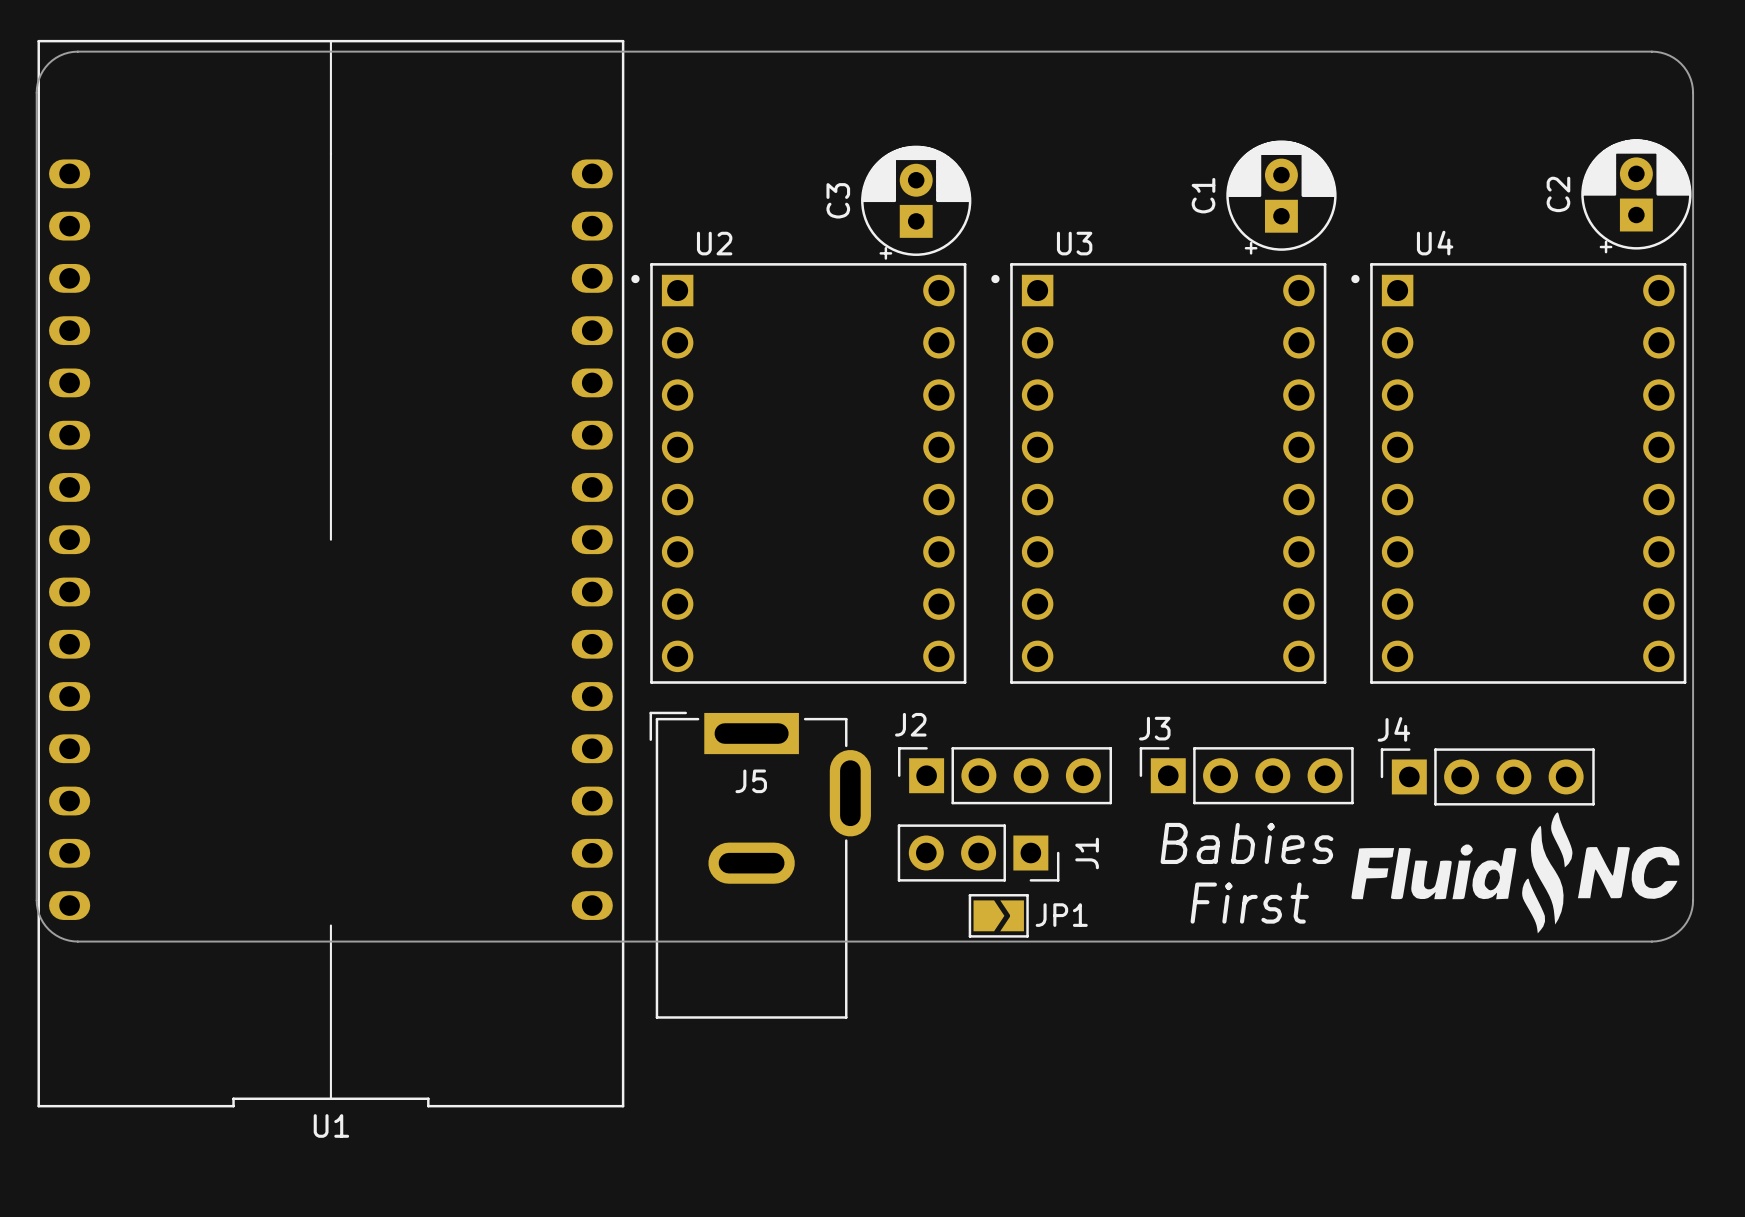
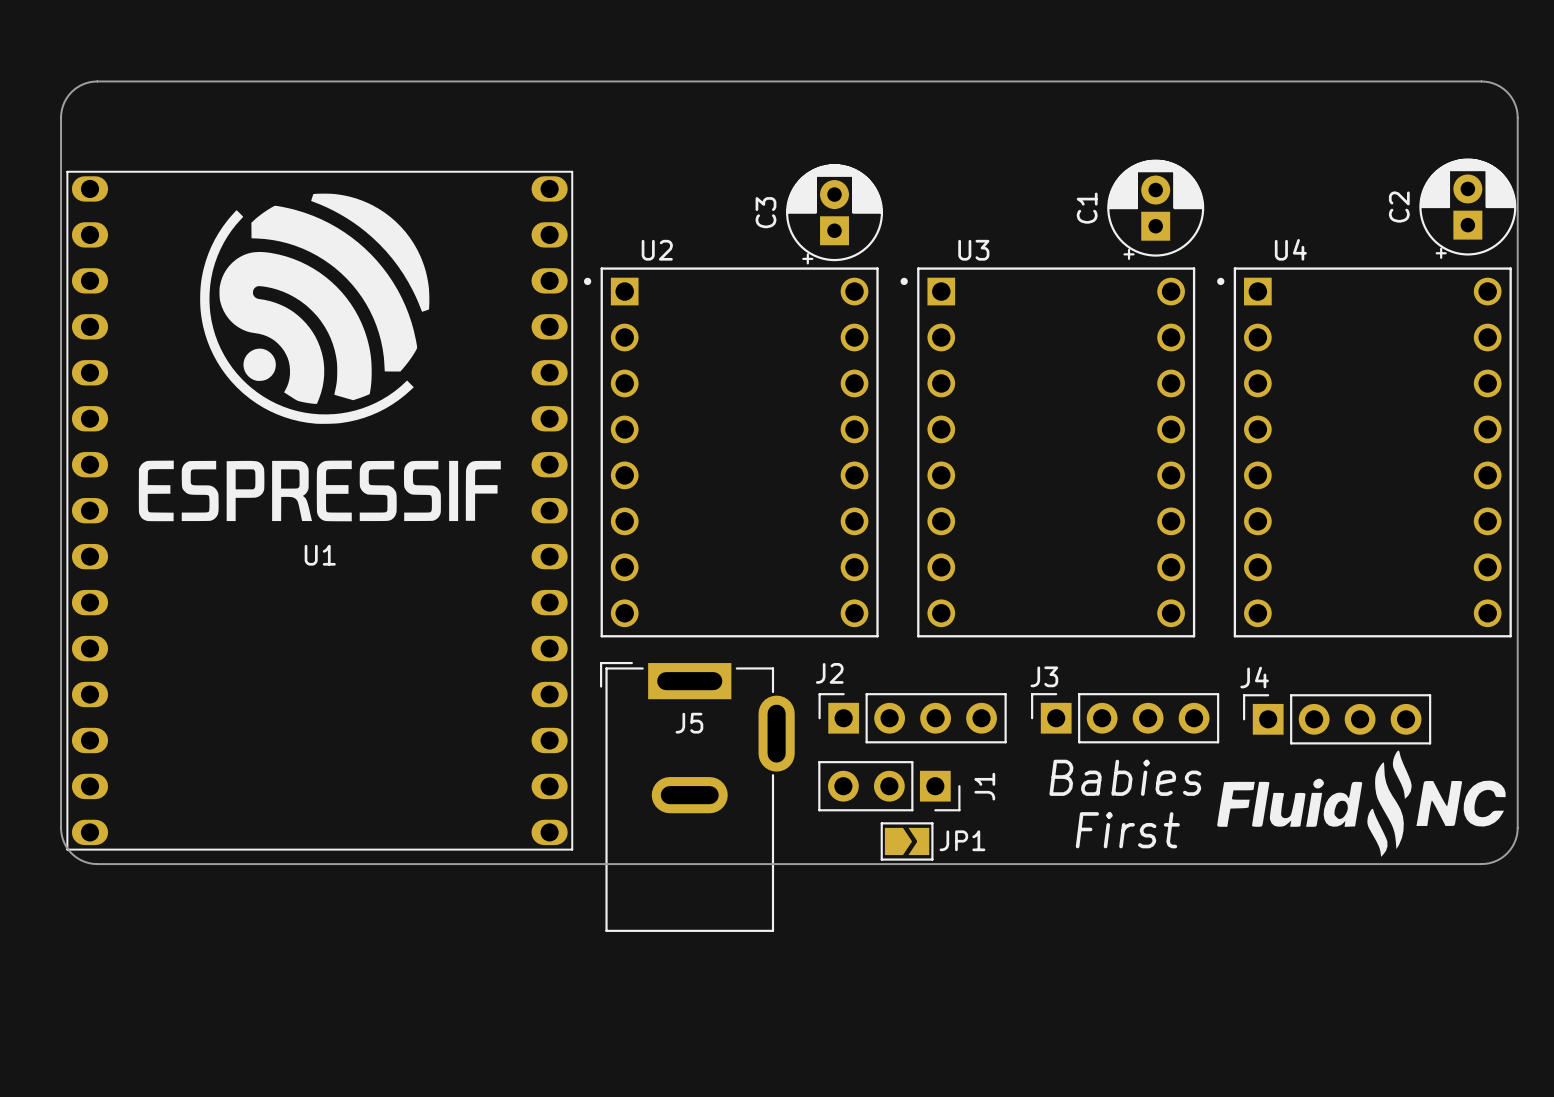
U1 footprint: [37, 39, 625, 1108] -> [66, 170, 574, 851]
U1 name position: U1 (331, 1125) -> U1 (320, 555)

